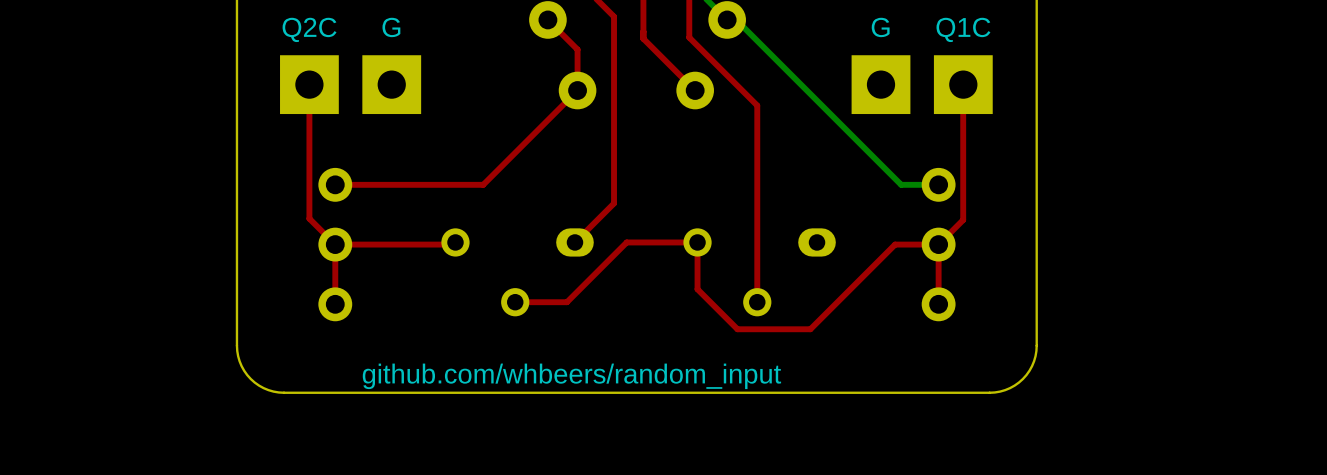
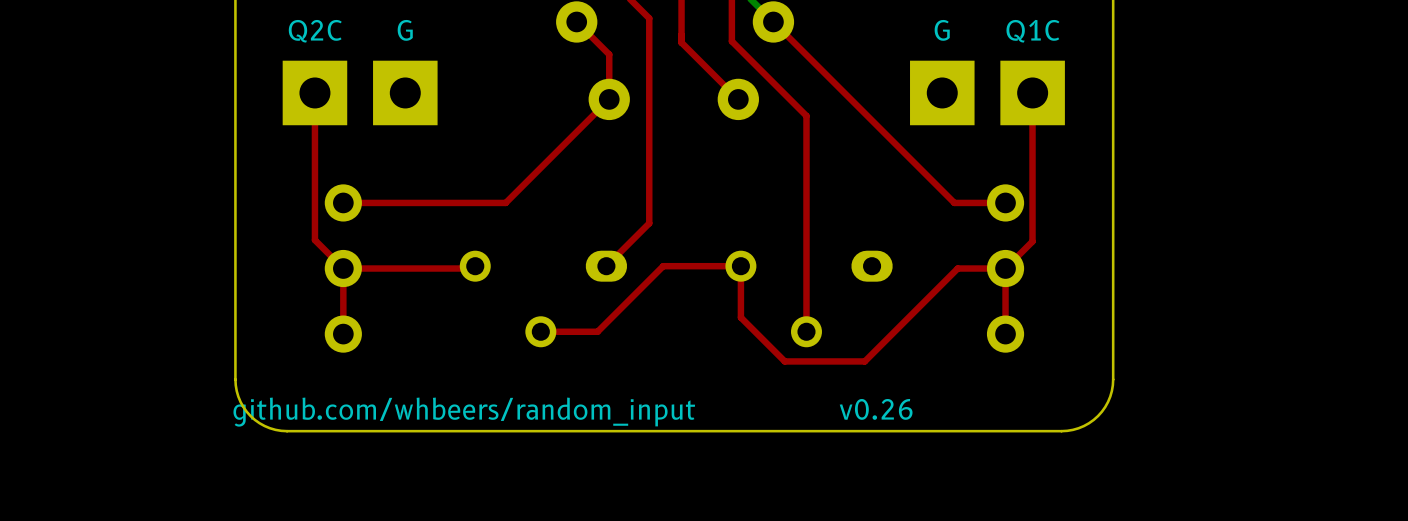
top track: none -> (773, 21) (954, 202) (1005, 202)
bottom track: (727, 19) (736, 19) (901, 184) (938, 184) -> none
text: github.com/whbeers/random_input (571, 376) -> github.com/whbeers/random_input v0.26 (572, 412)

